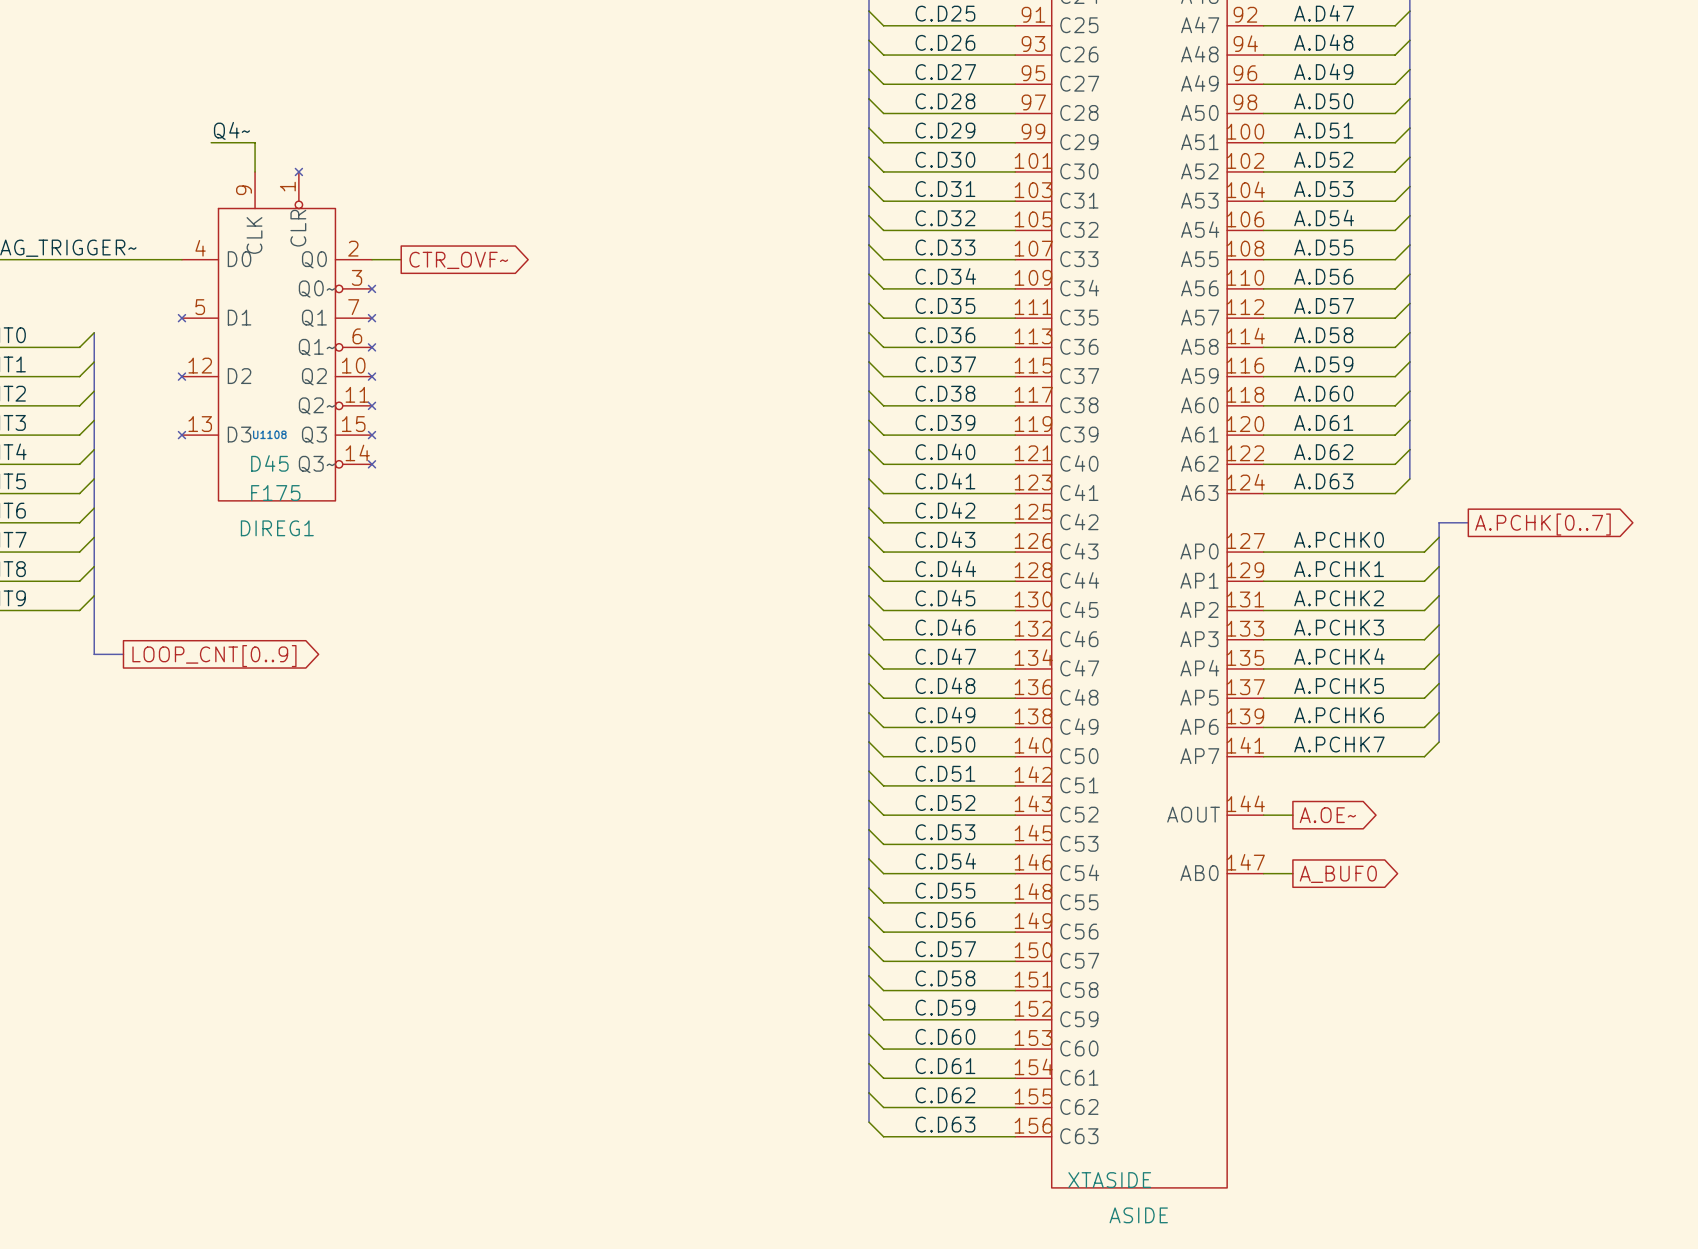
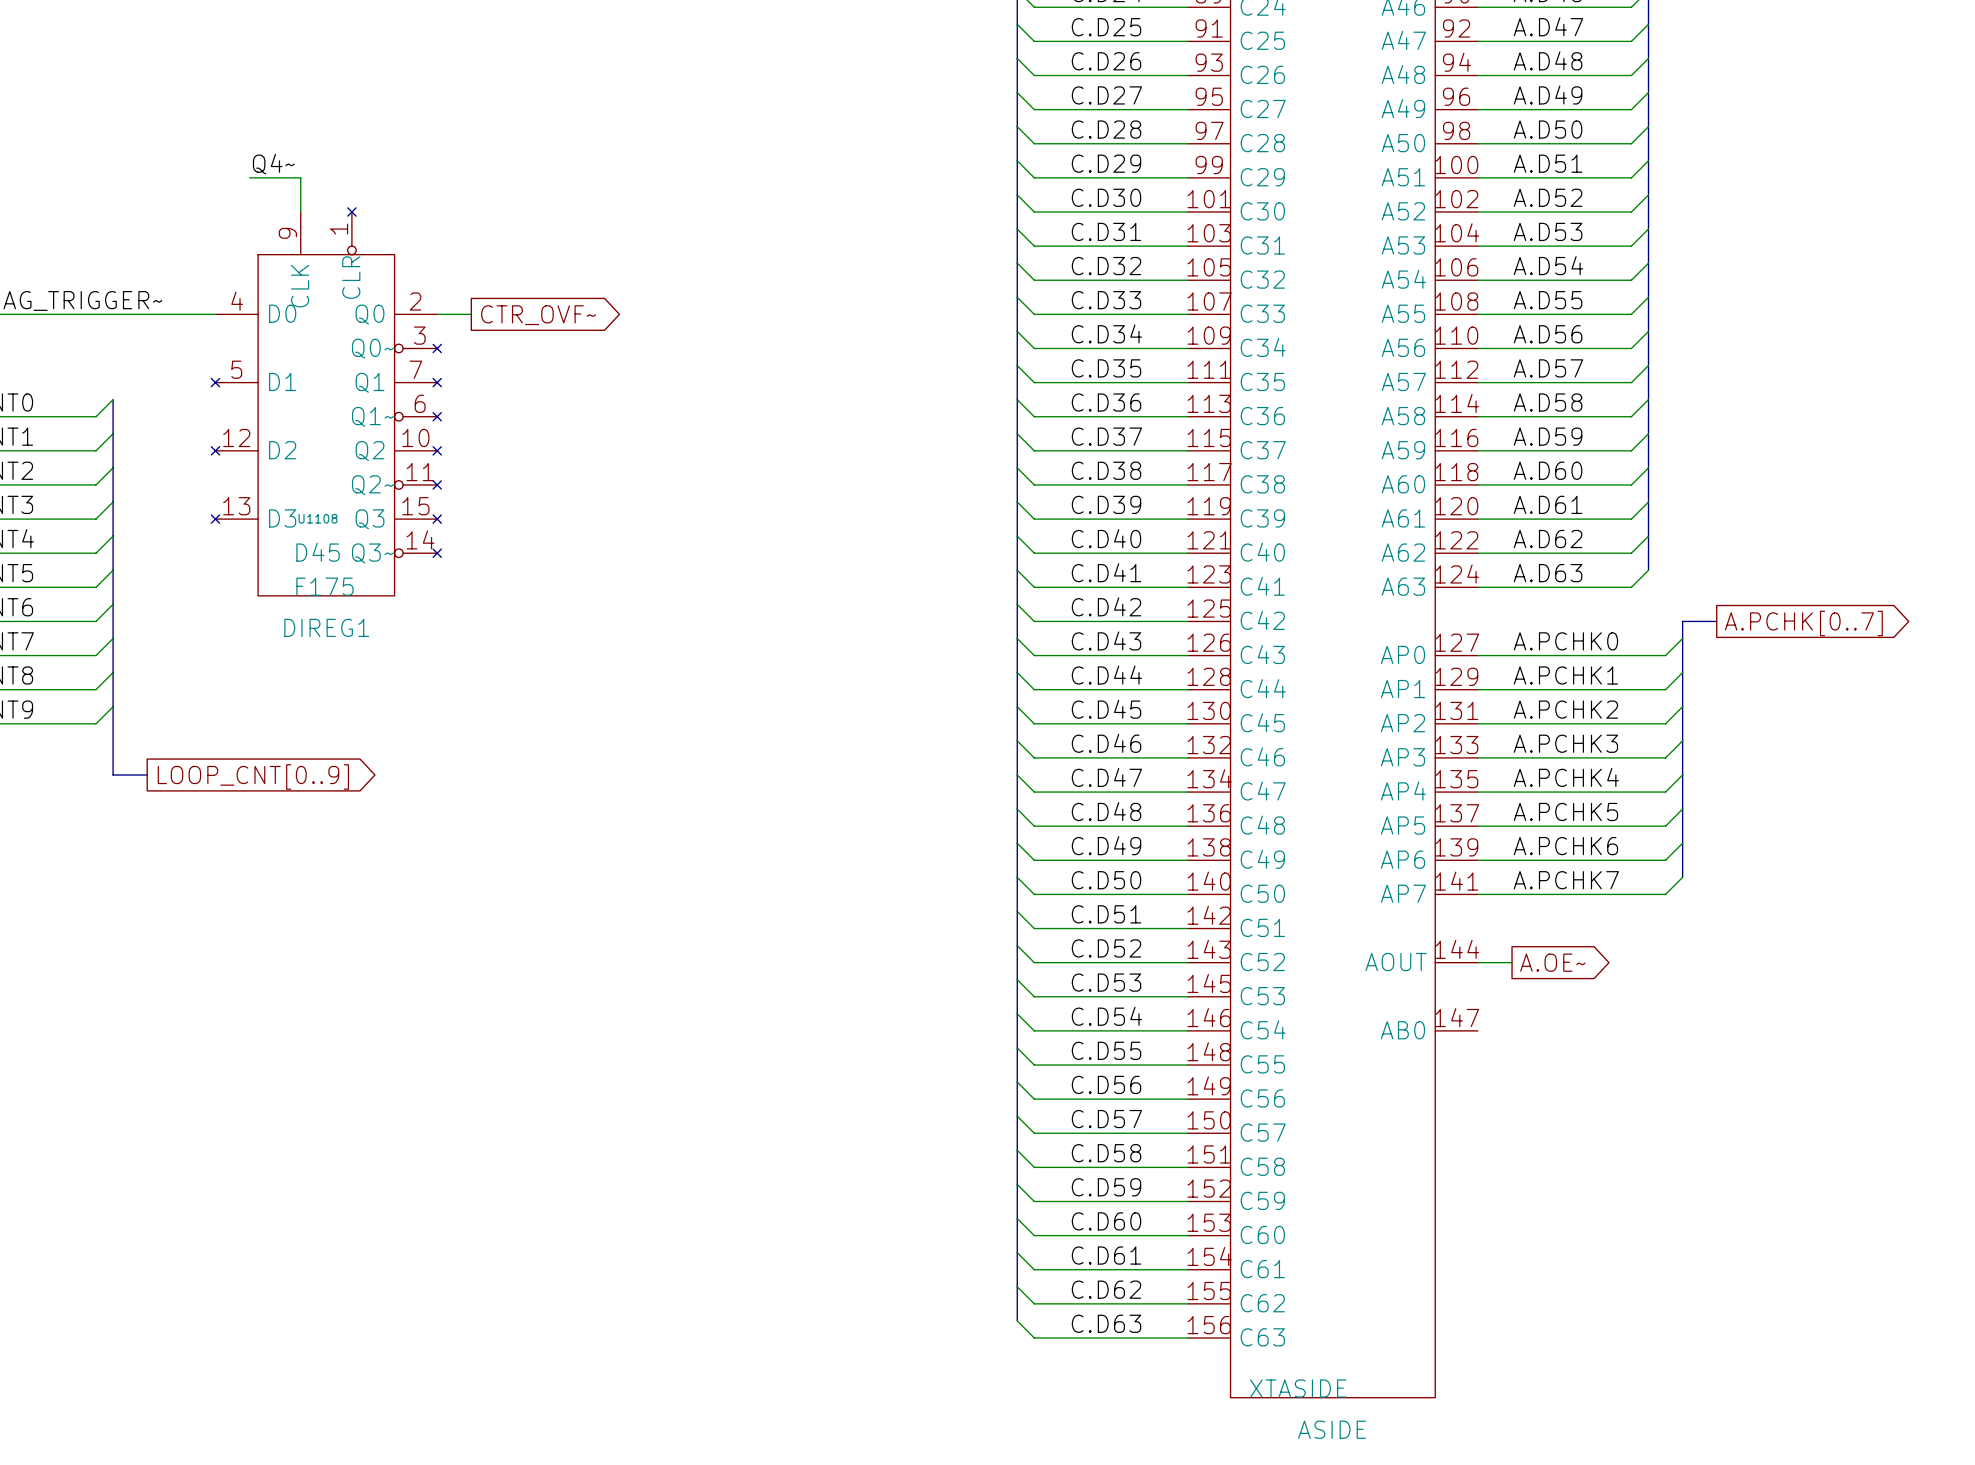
wire: (1263, 873) (1292, 873) -> none
global label: A_BUF0 (1338, 874) -> none

